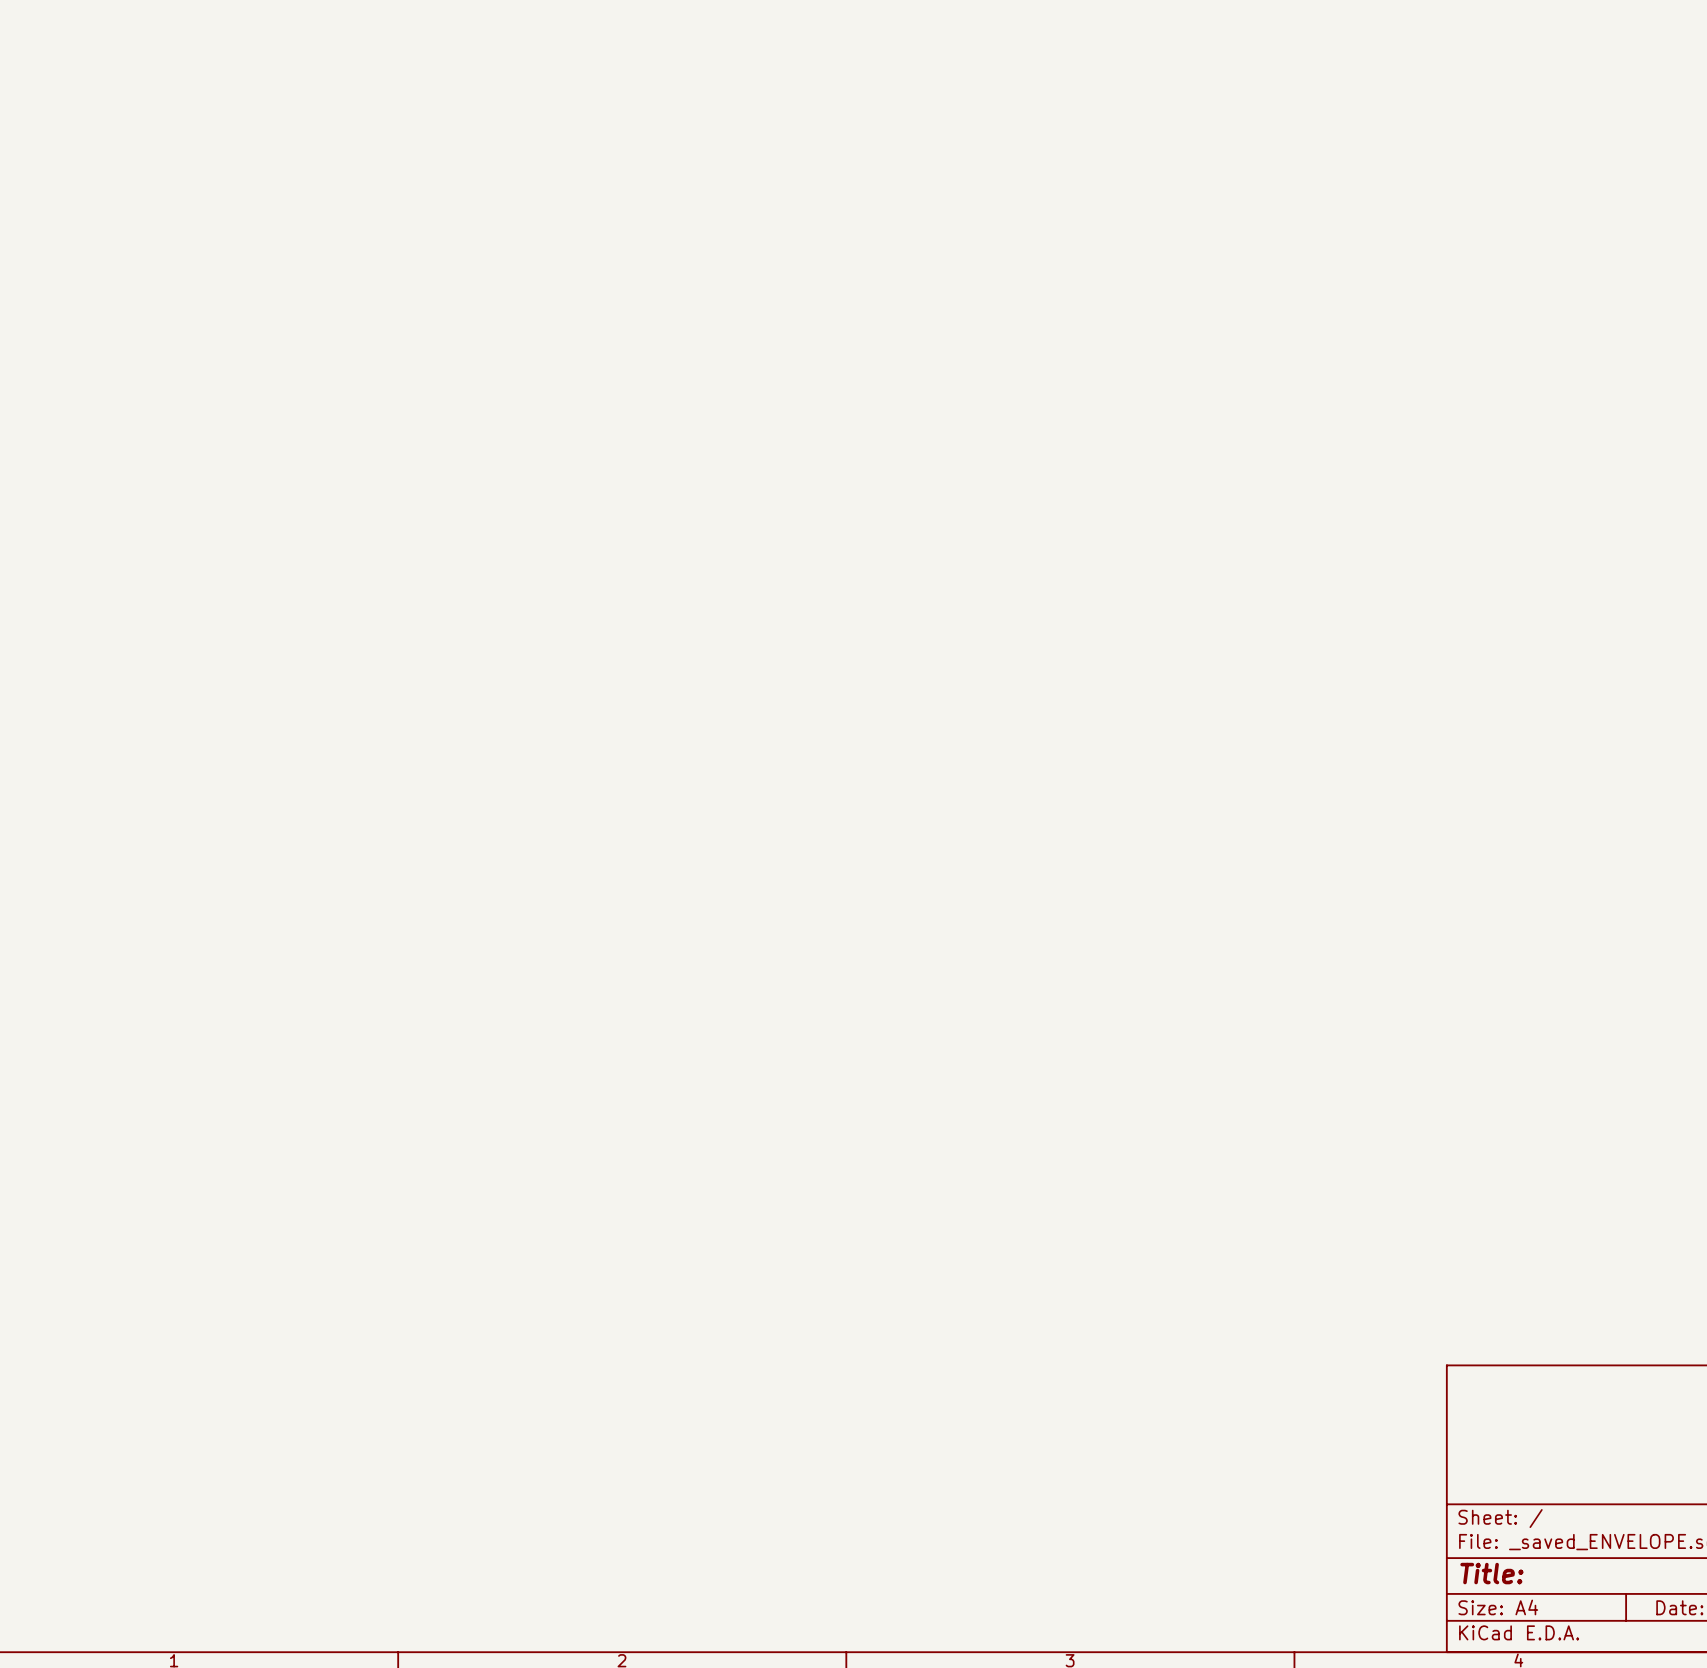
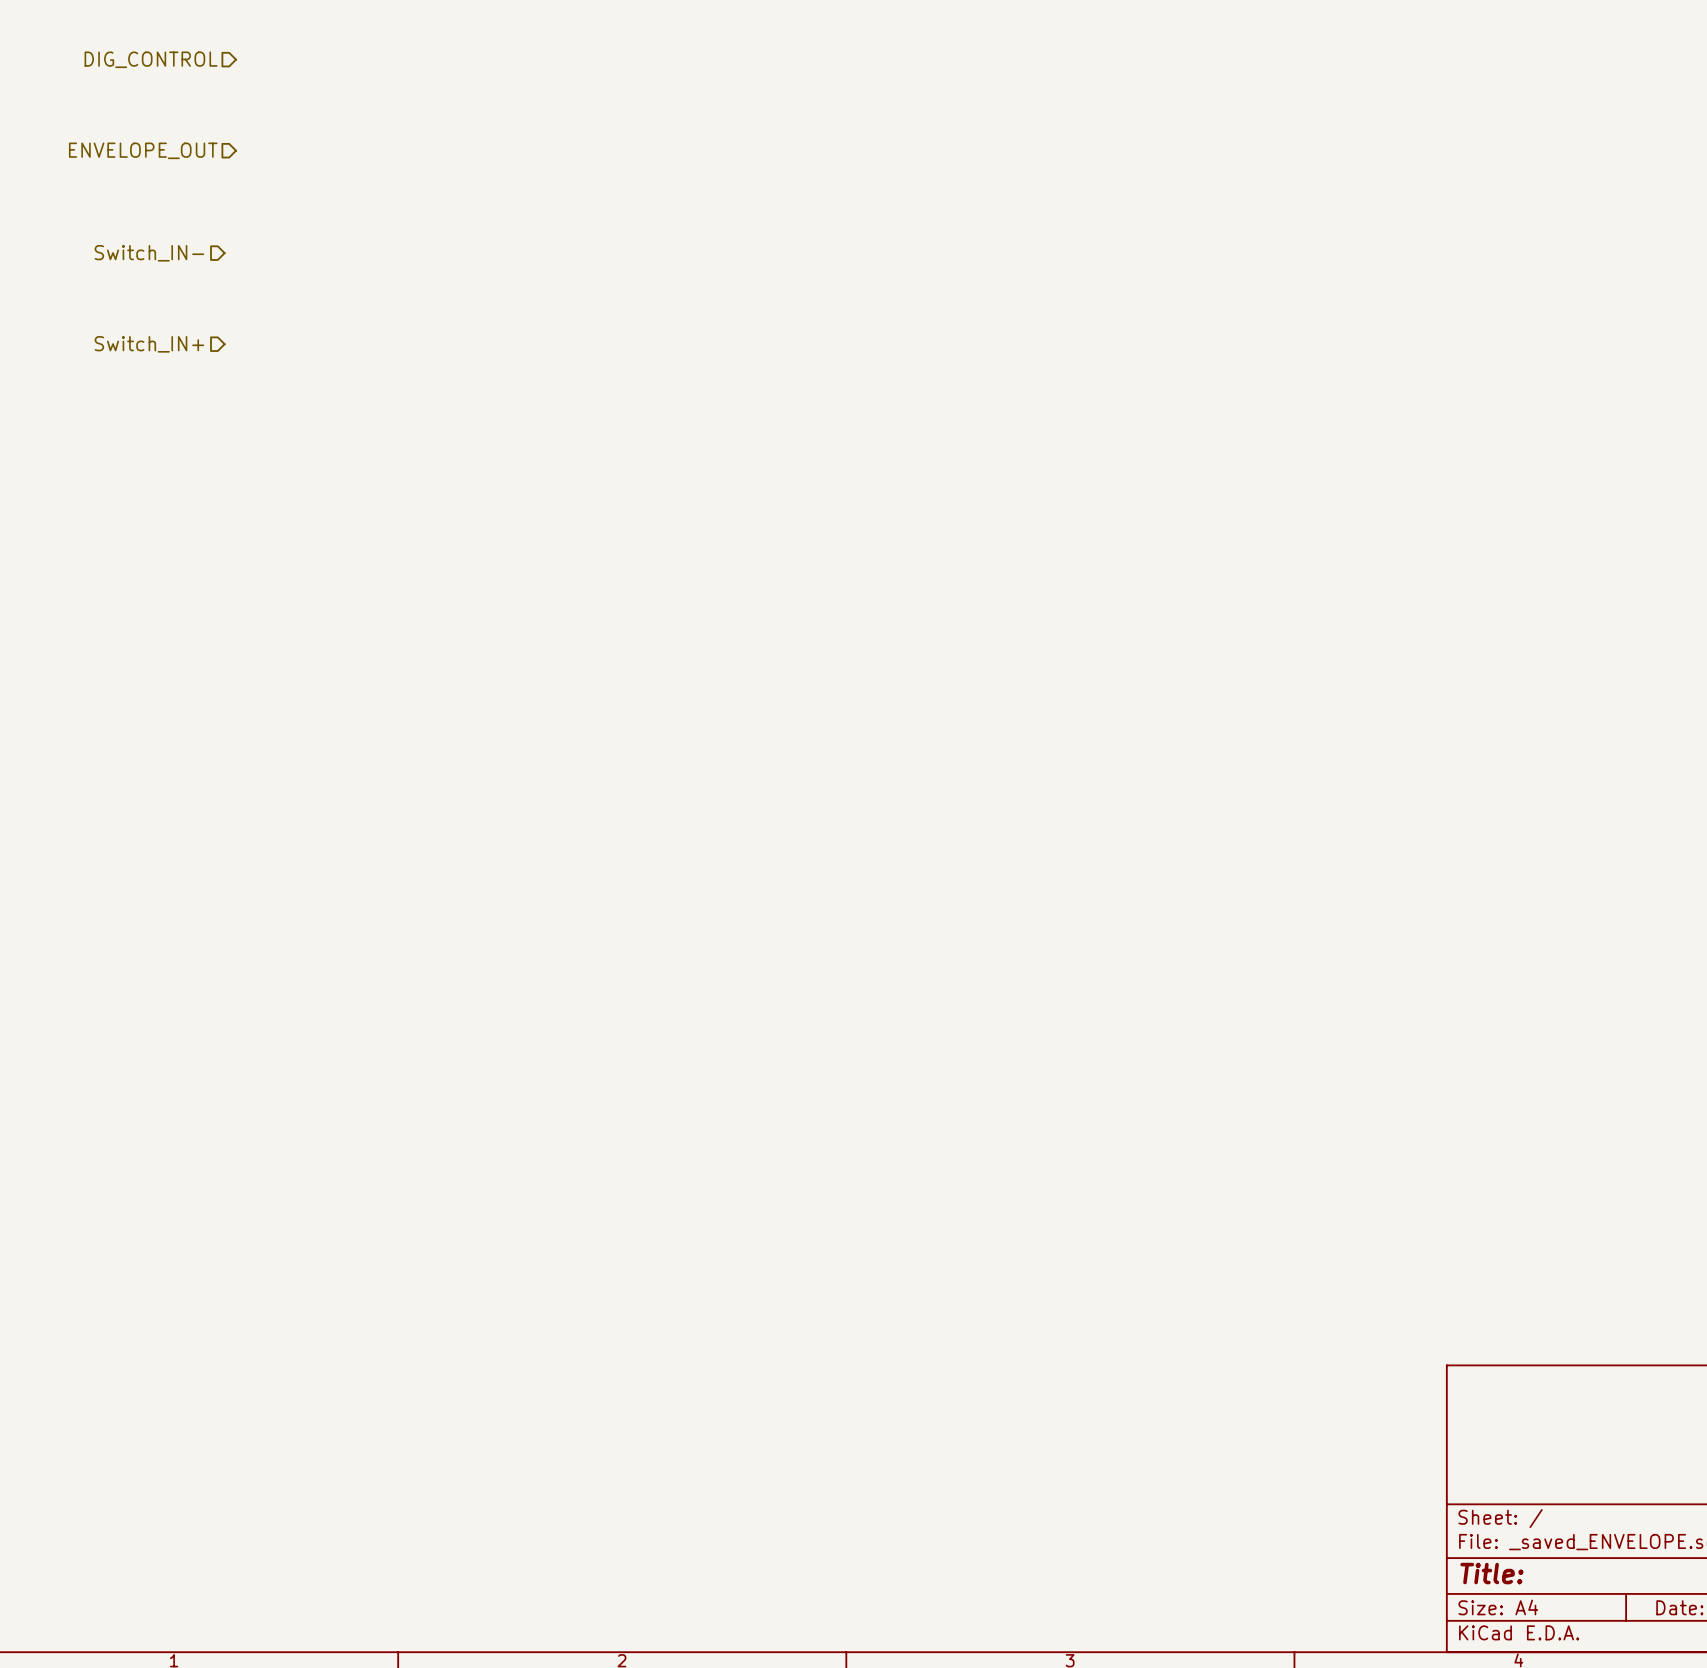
hierarchical label: none -> DIG_CONTROL (151, 59)
hierarchical label: none -> ENVELOPE_OUT (143, 150)
hierarchical label: none -> Switch_IN- (149, 253)
hierarchical label: none -> Switch_IN+ (149, 344)

